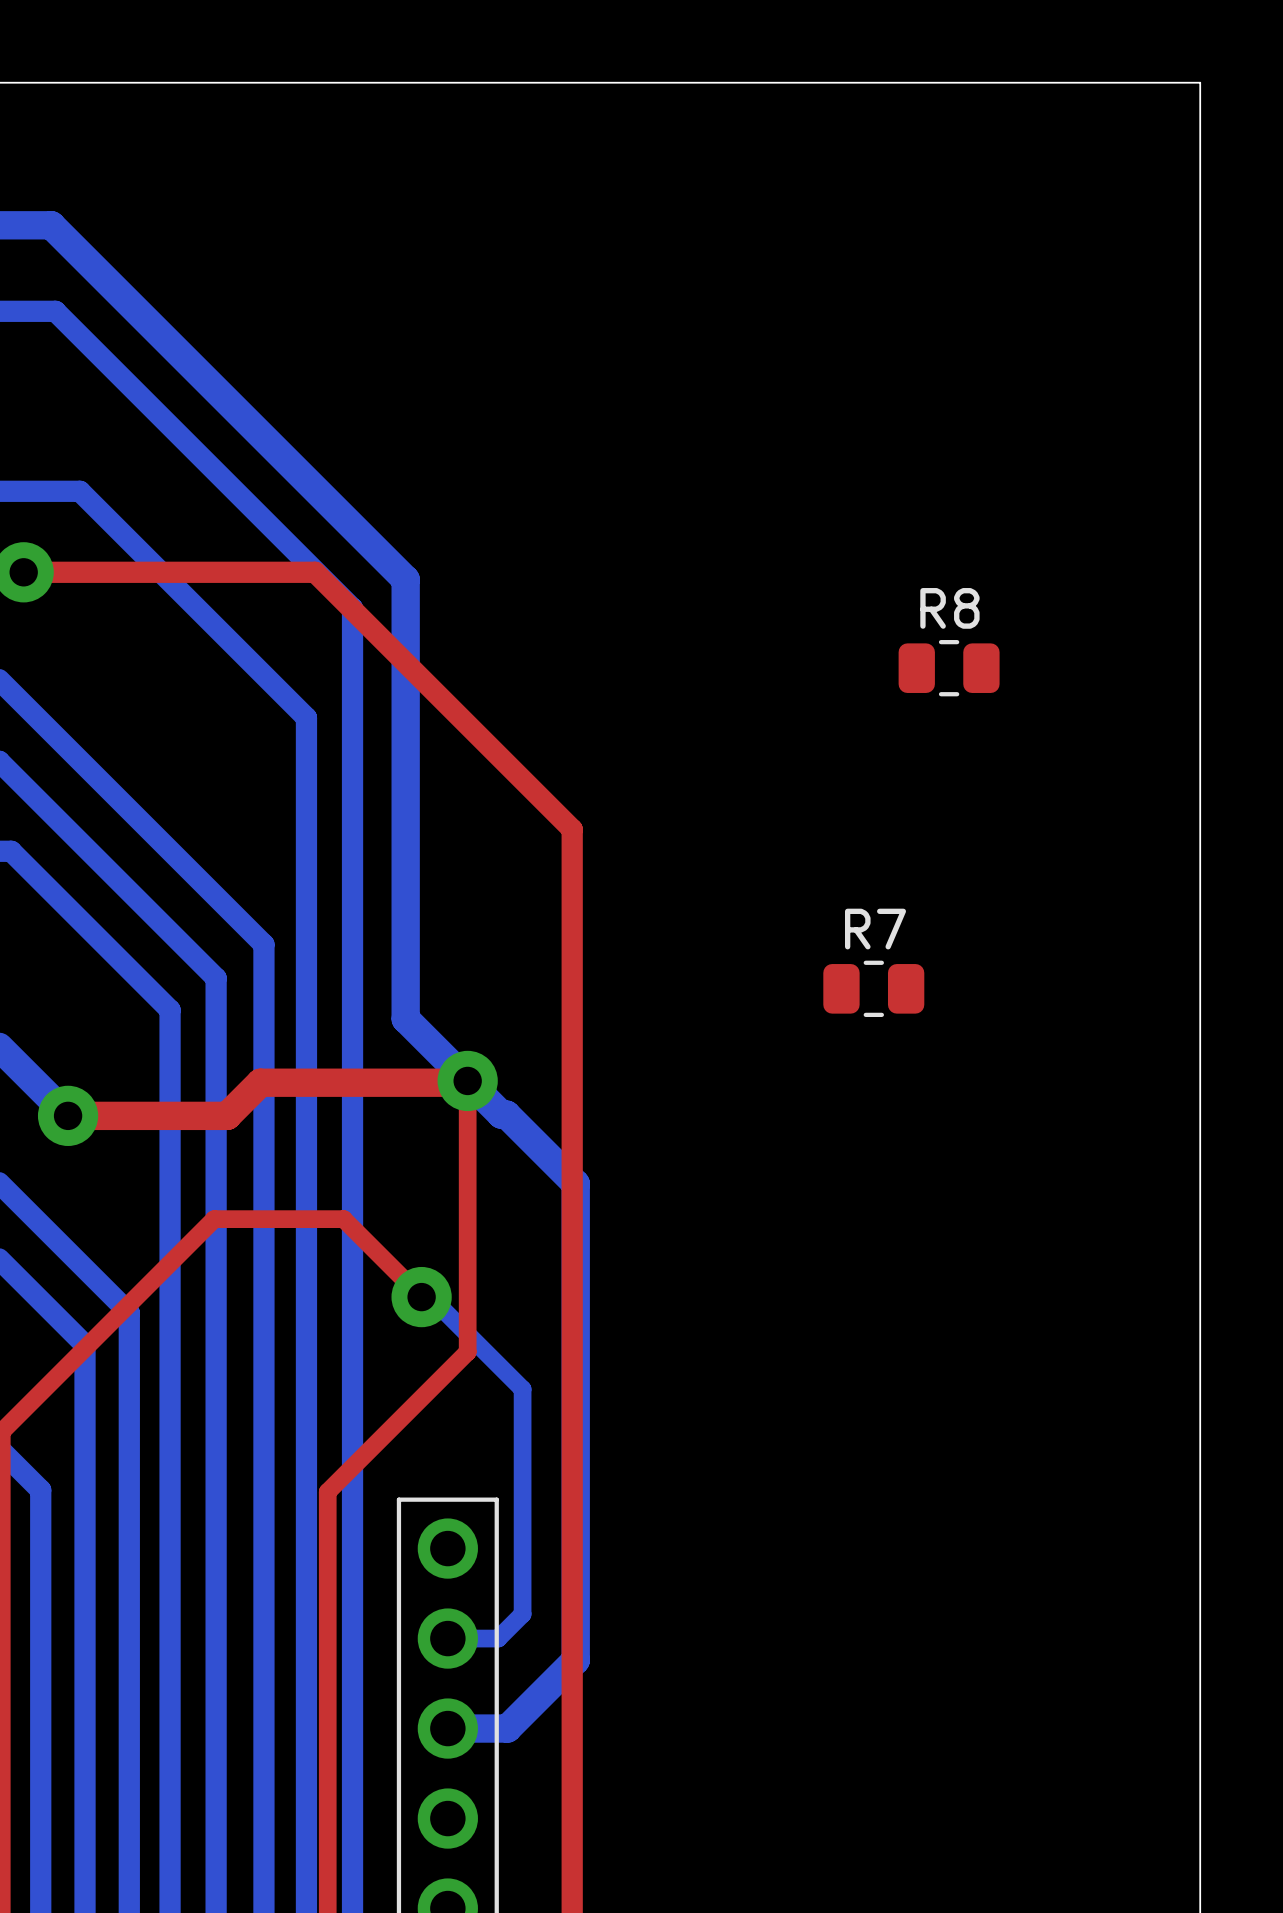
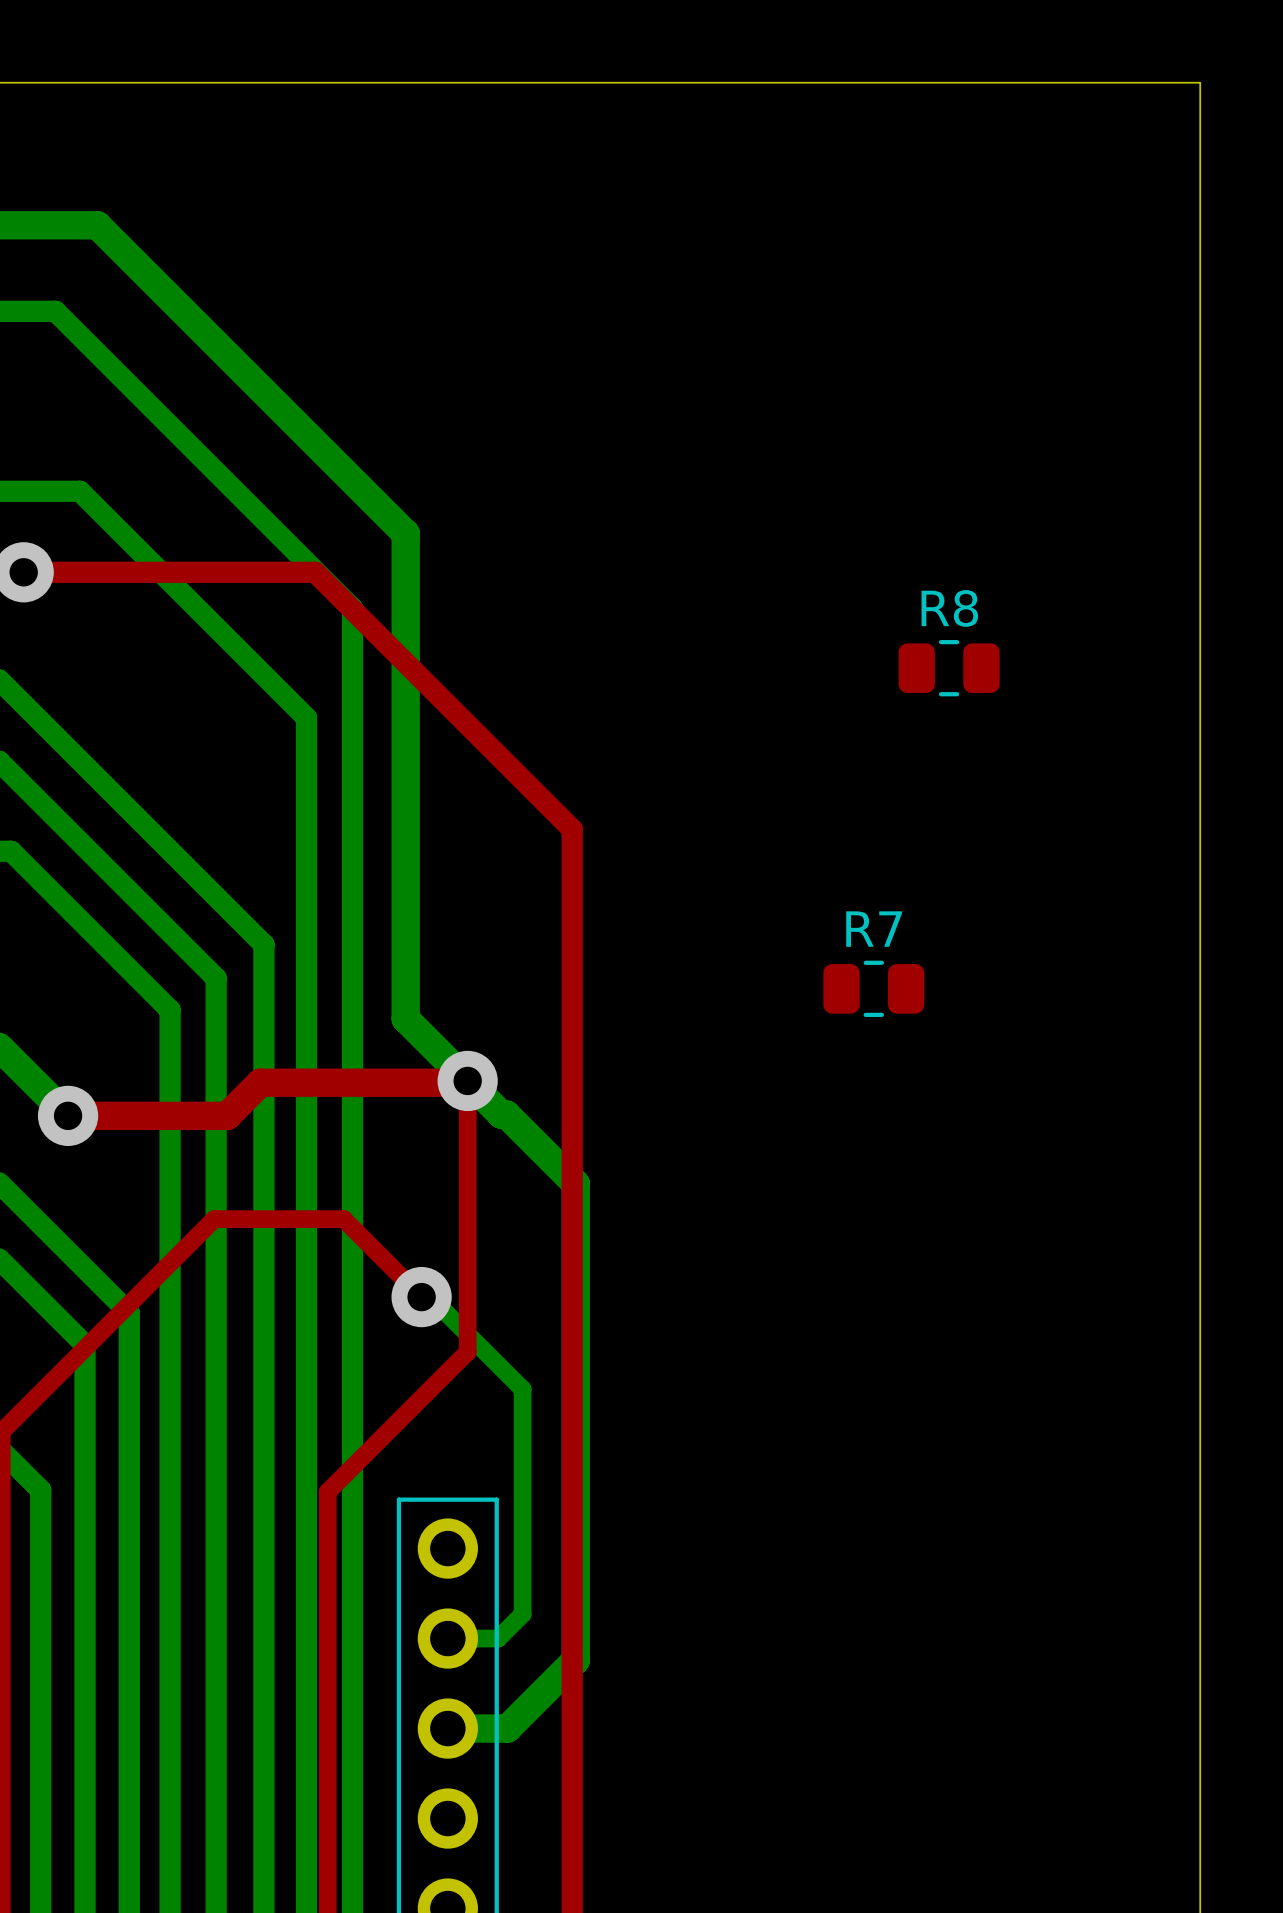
bottom track: (51, 225) (405, 579) -> (51, 225) (97, 225) (405, 533) (405, 579)

